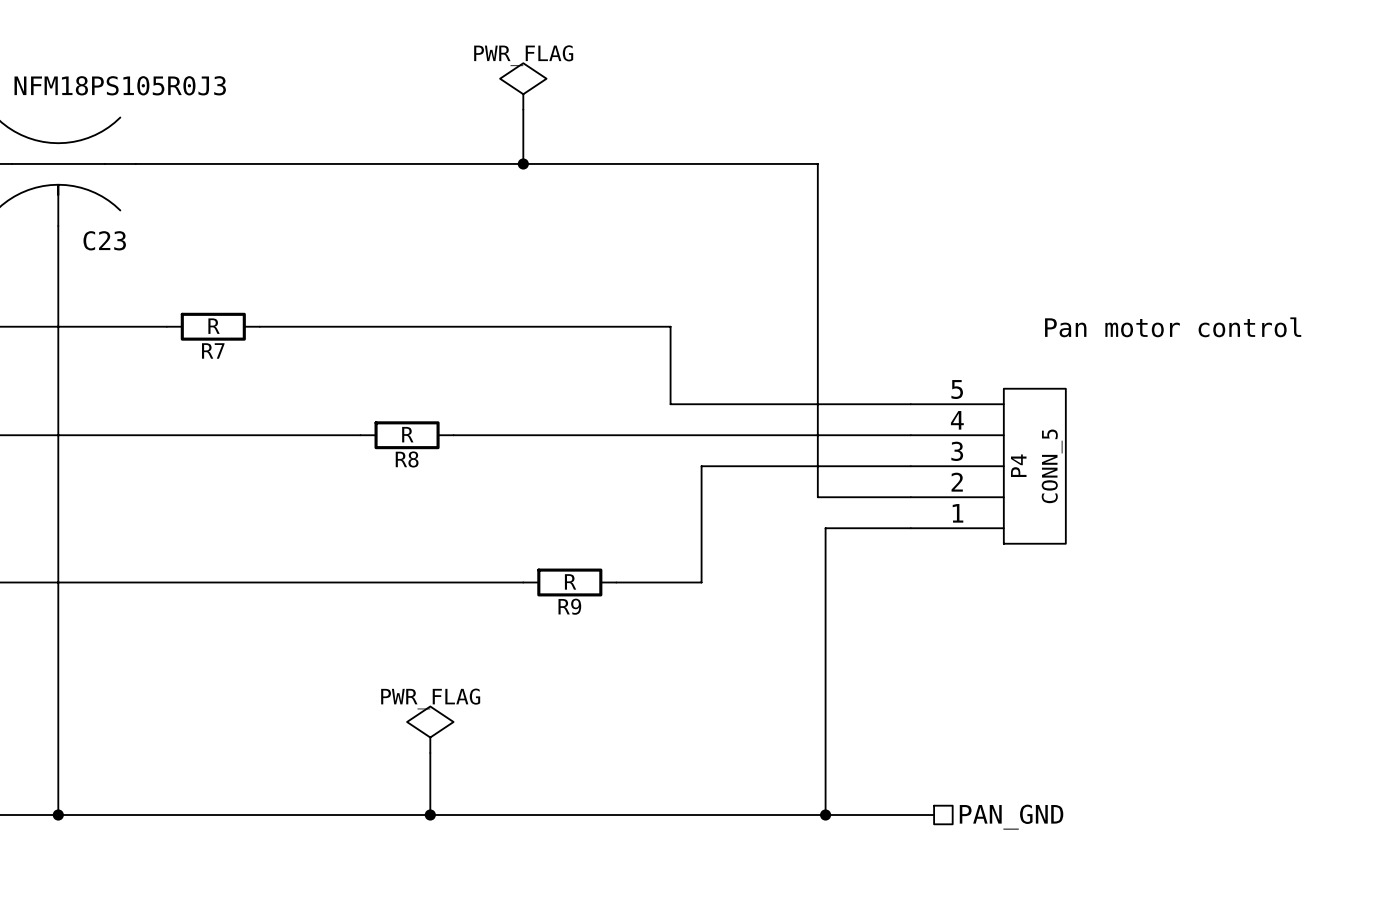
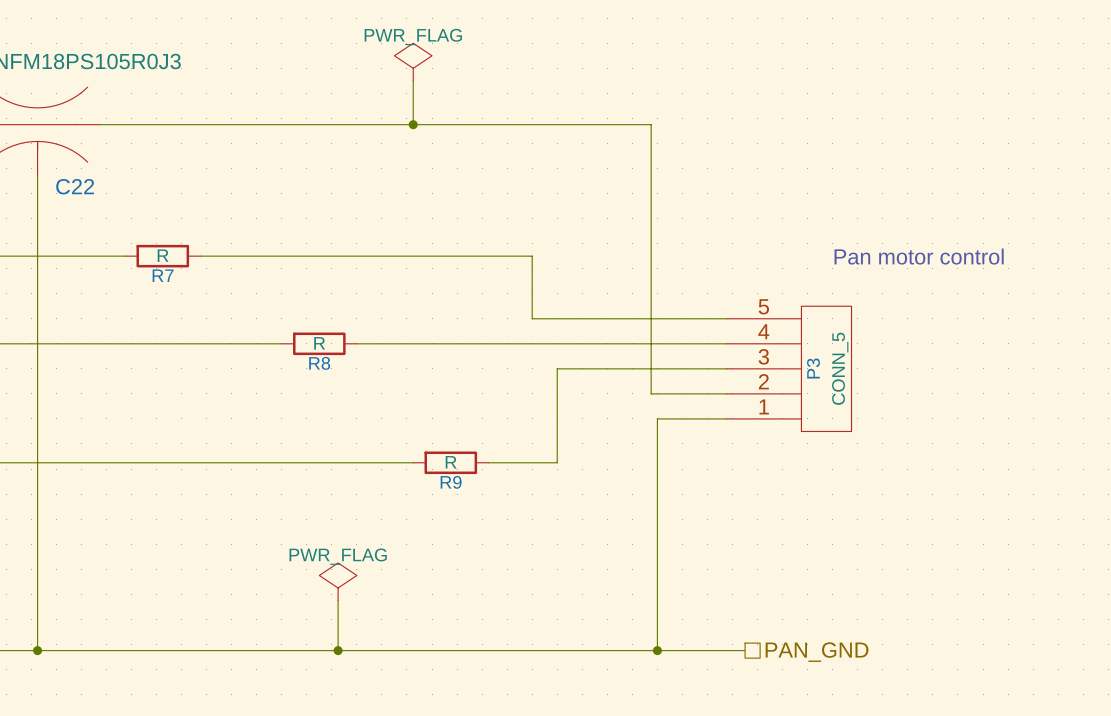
C23 name: C23 (104, 240) -> C22 (75, 186)
P4 name: P4 (1018, 465) -> P3 (813, 368)

